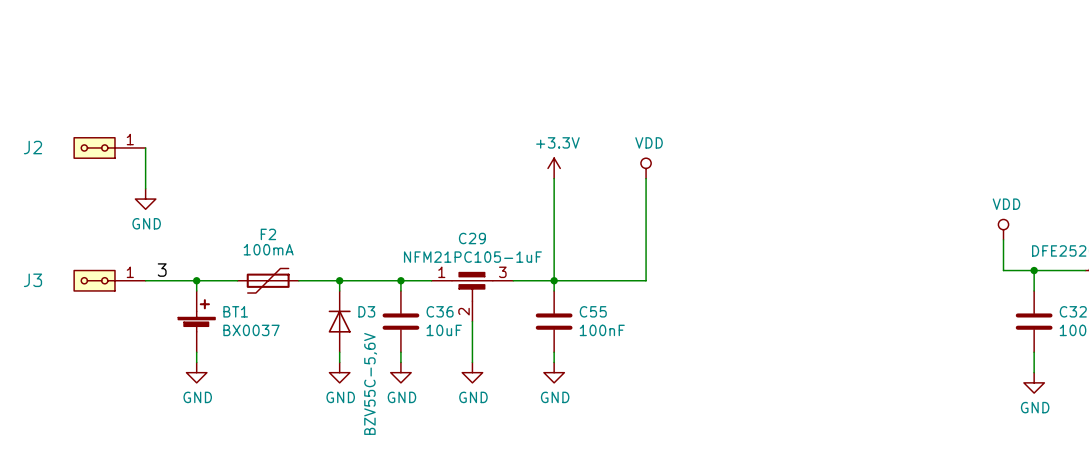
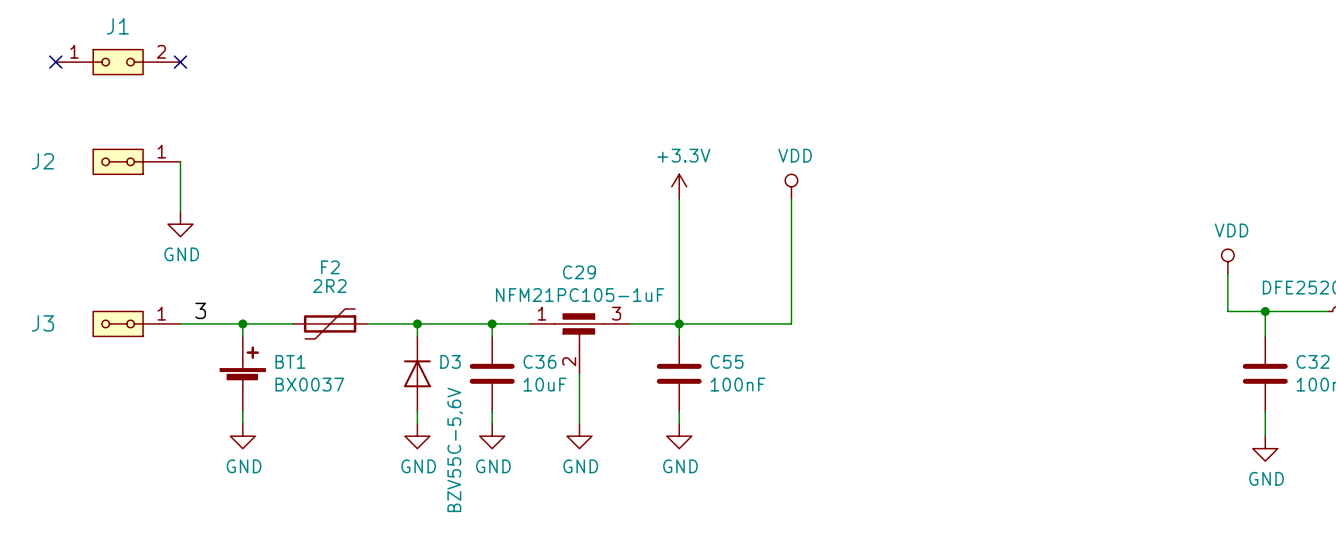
no-connect mark: none -> (55, 62)
J1: none -> (118, 62)
no-connect mark: none -> (180, 62)
F2 value: 100mA (268, 249) -> 2R2 (329, 286)

